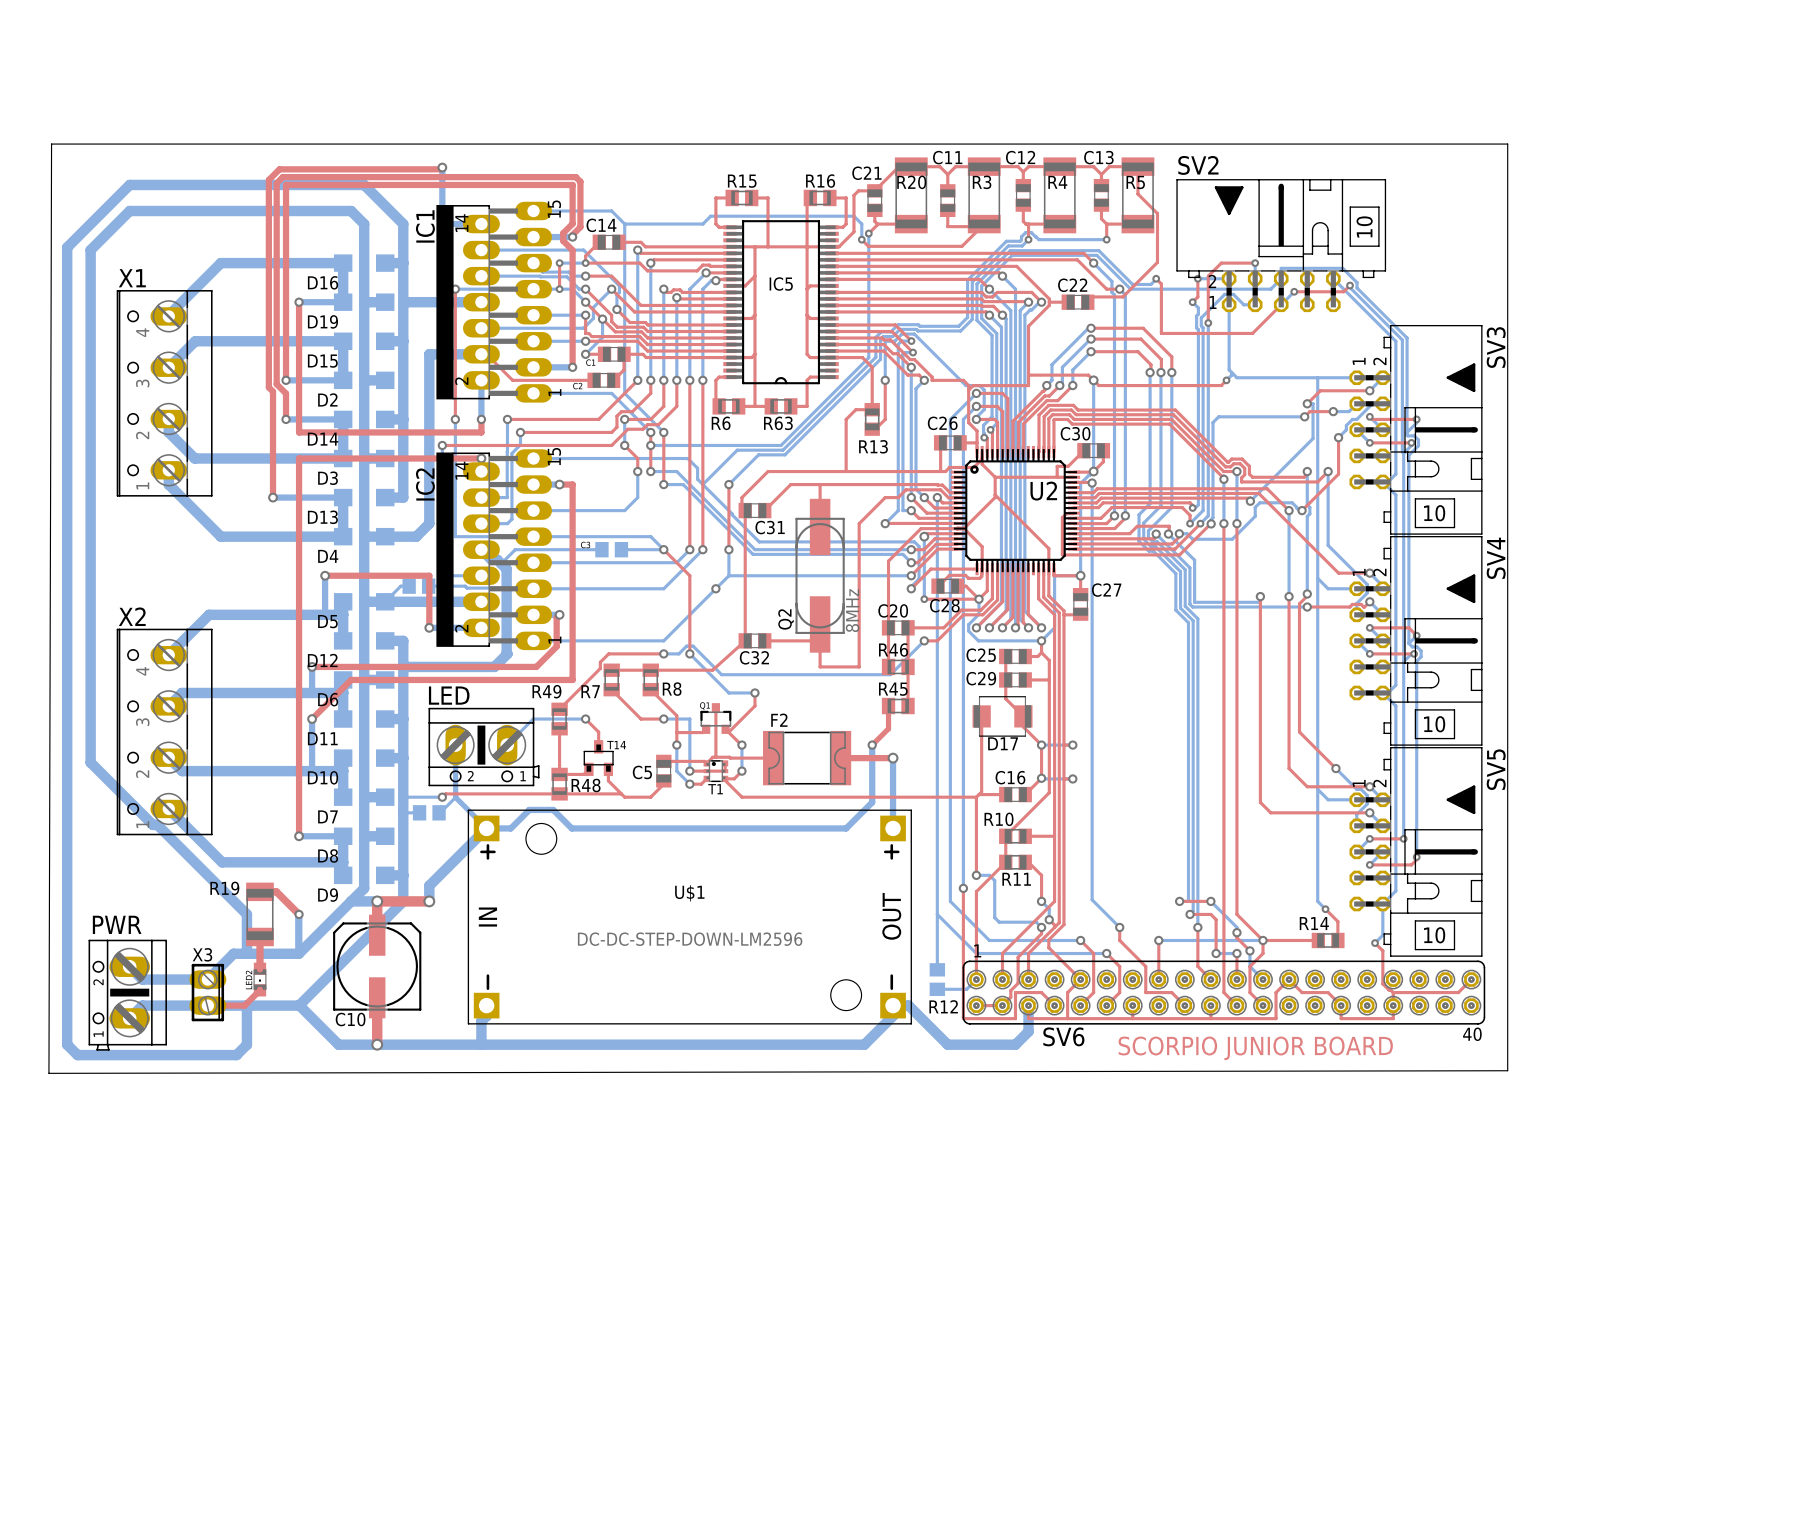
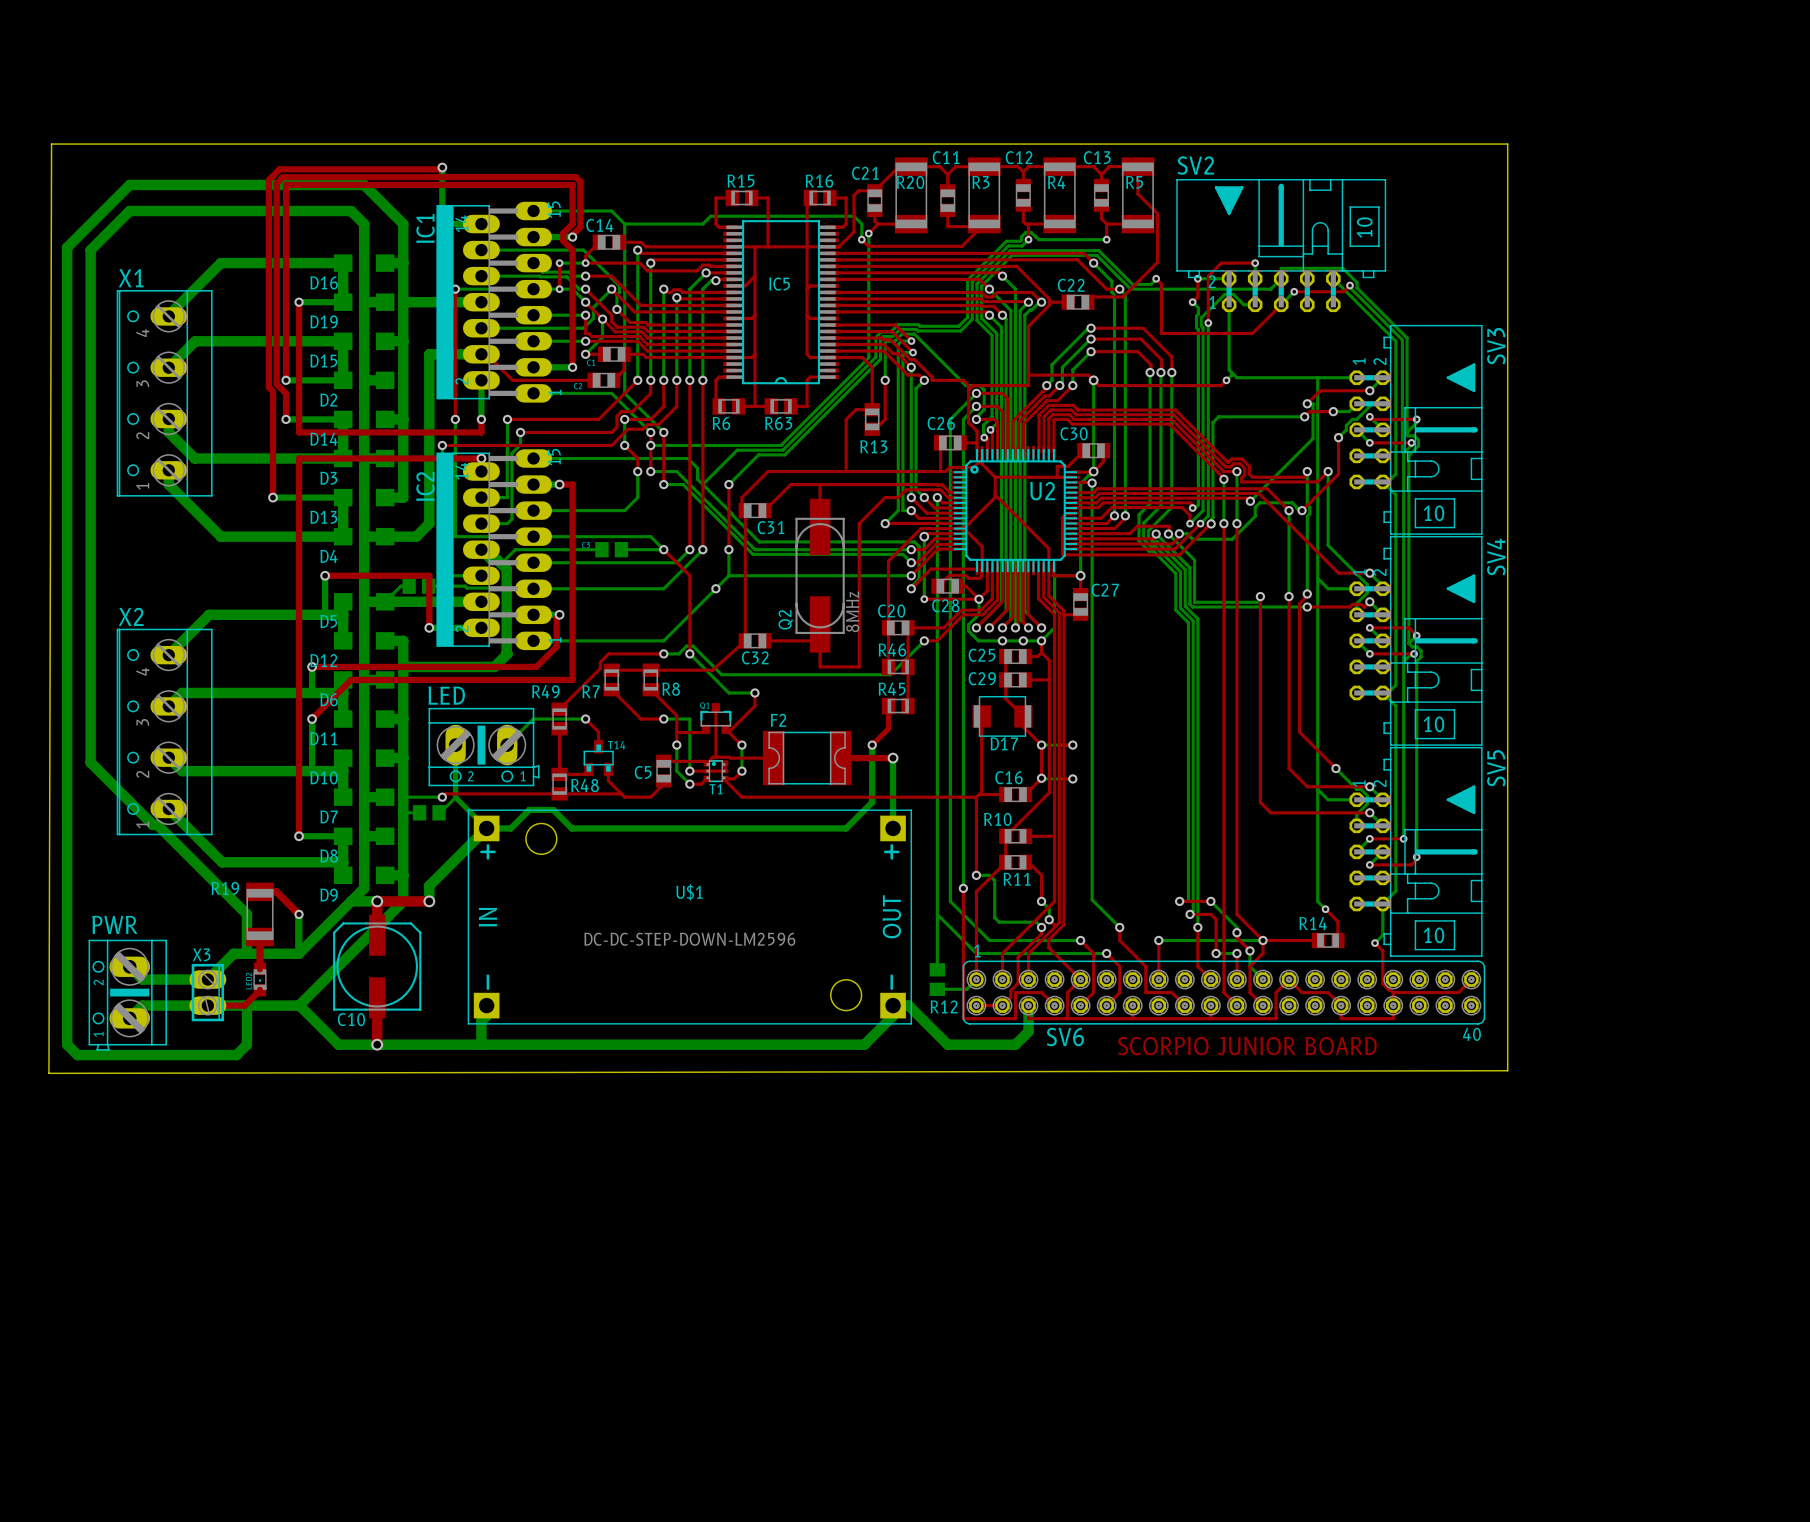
via: none -> (1002, 640)
via: none -> (1023, 640)

